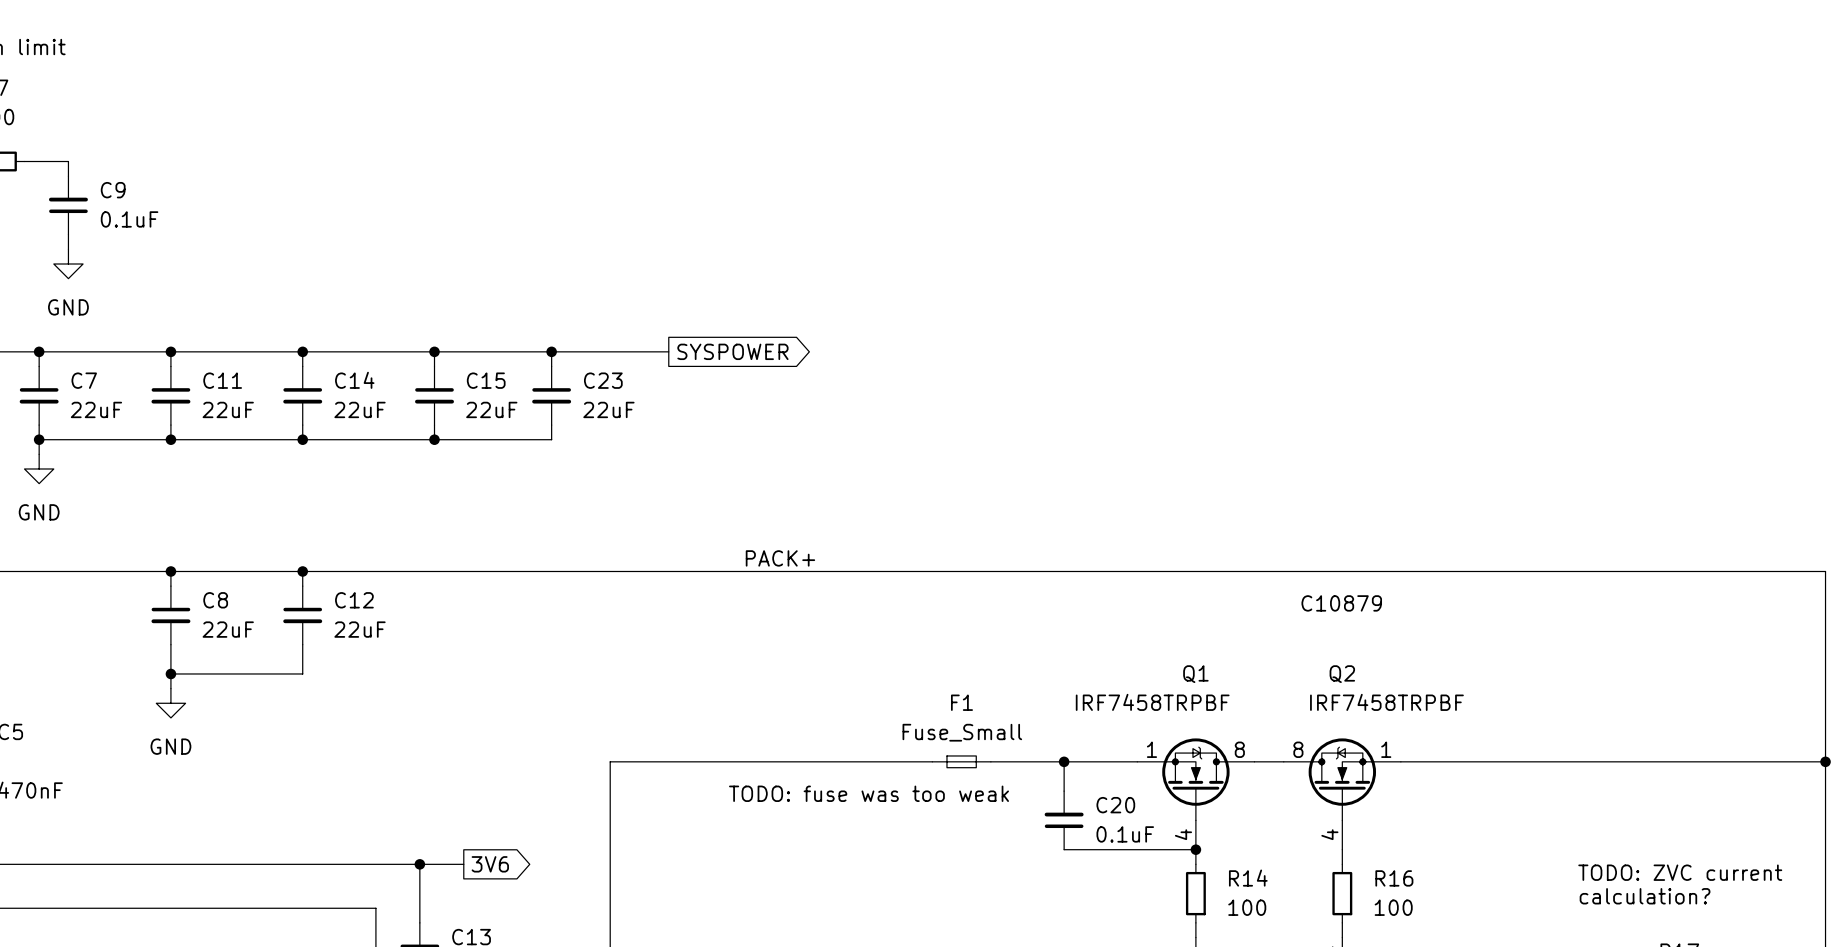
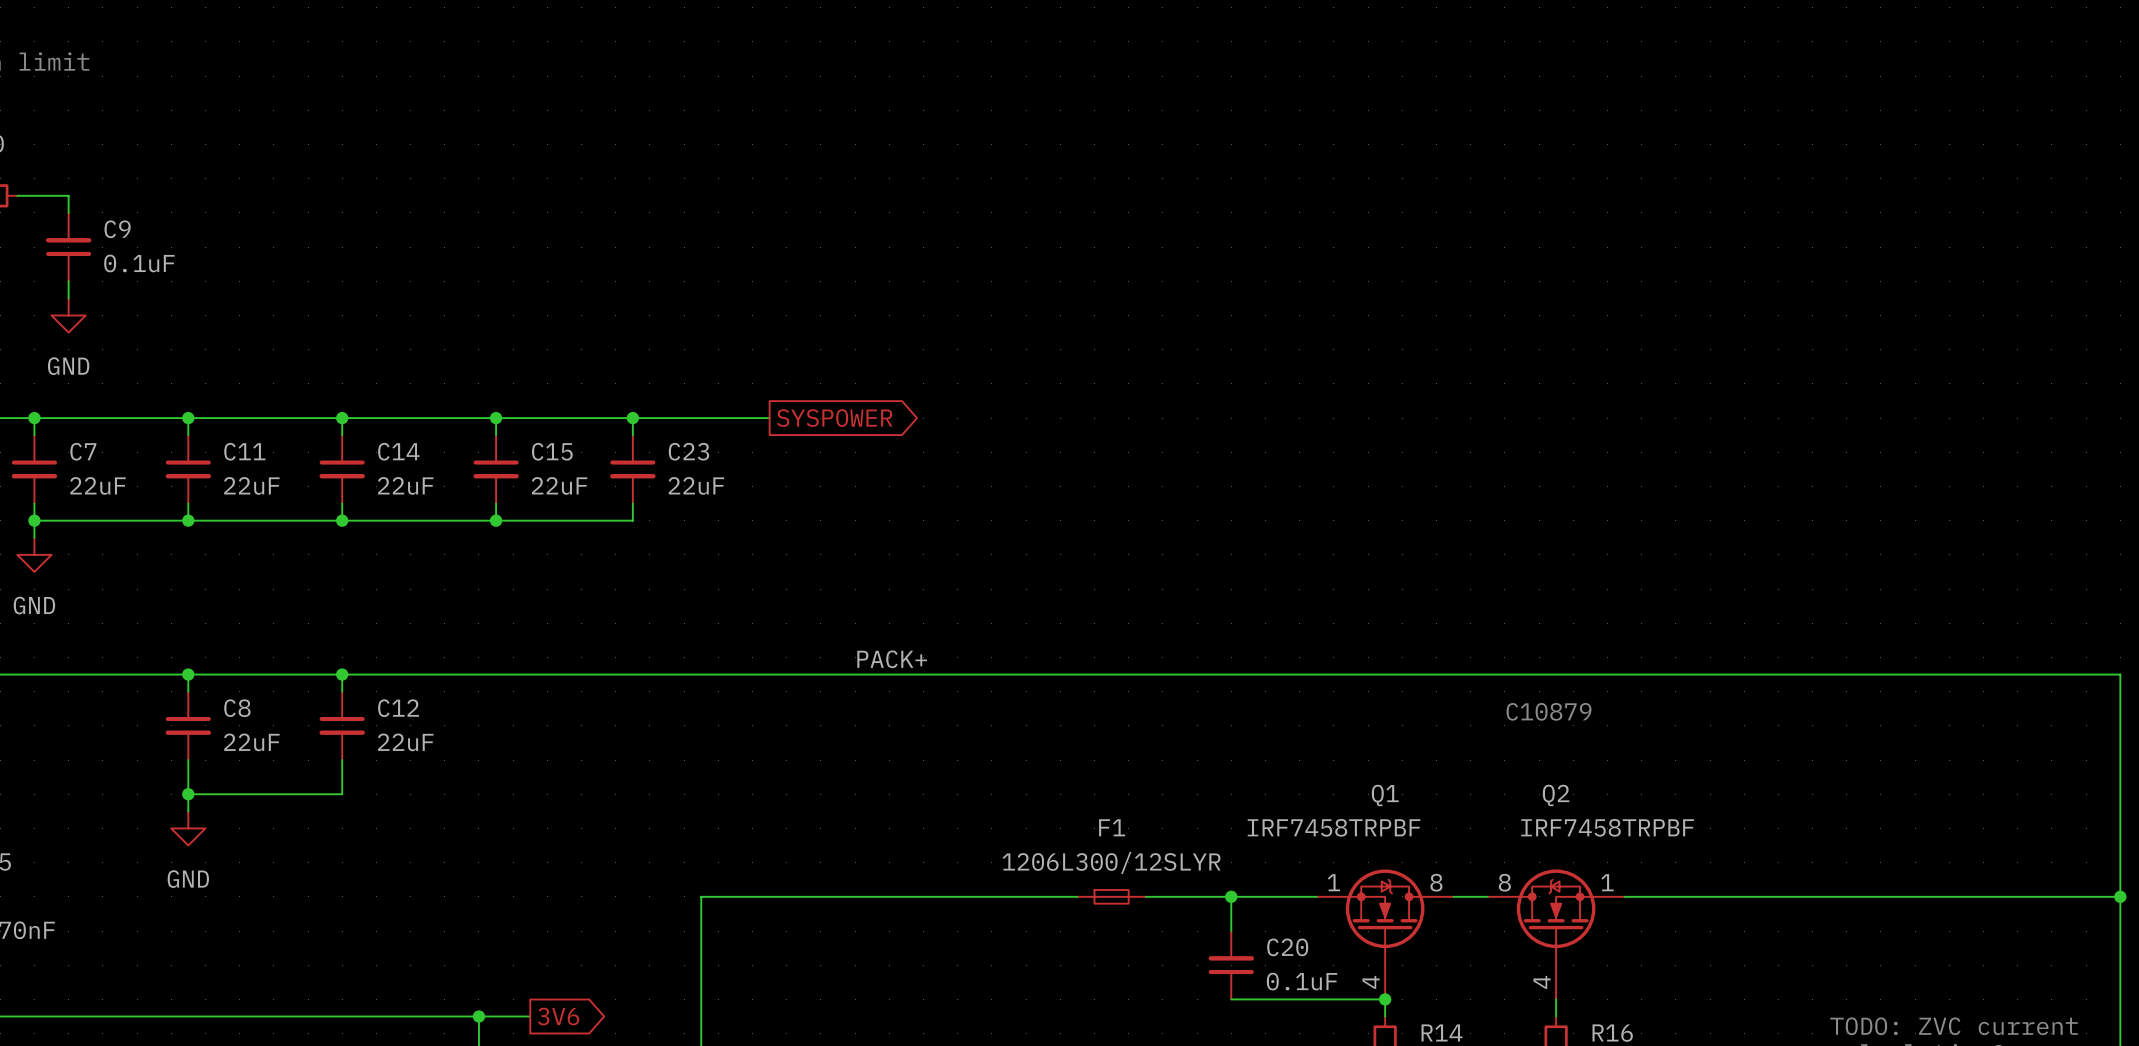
F1 value: Fuse_Small (962, 732) -> 1206L300/12SLYR (1111, 862)
text: TODO: fuse was too weak (869, 793) -> none

